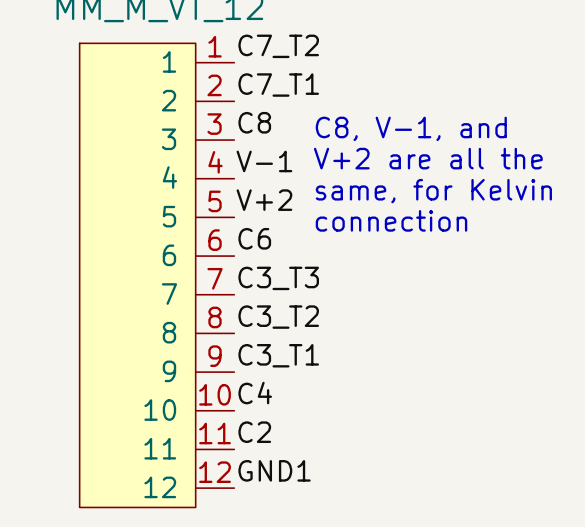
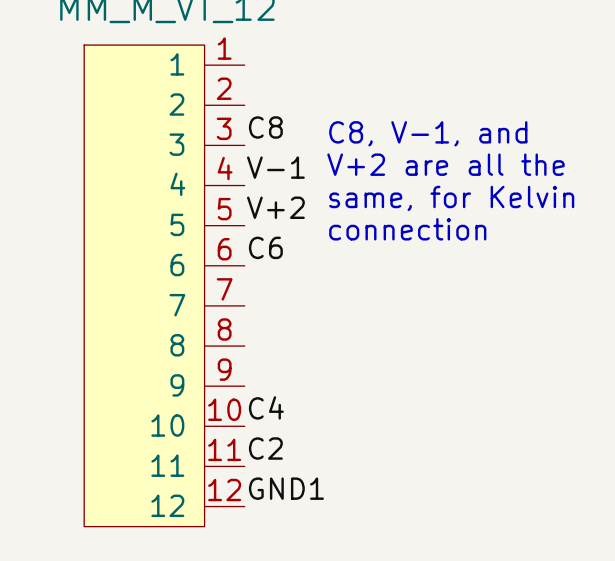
label: C7_T2 (278, 46) -> none
label: C7_T1 (278, 85) -> none
label: C3_T3 (278, 278) -> none
label: C3_T2 (278, 317) -> none
label: C3_T1 (278, 355) -> none

